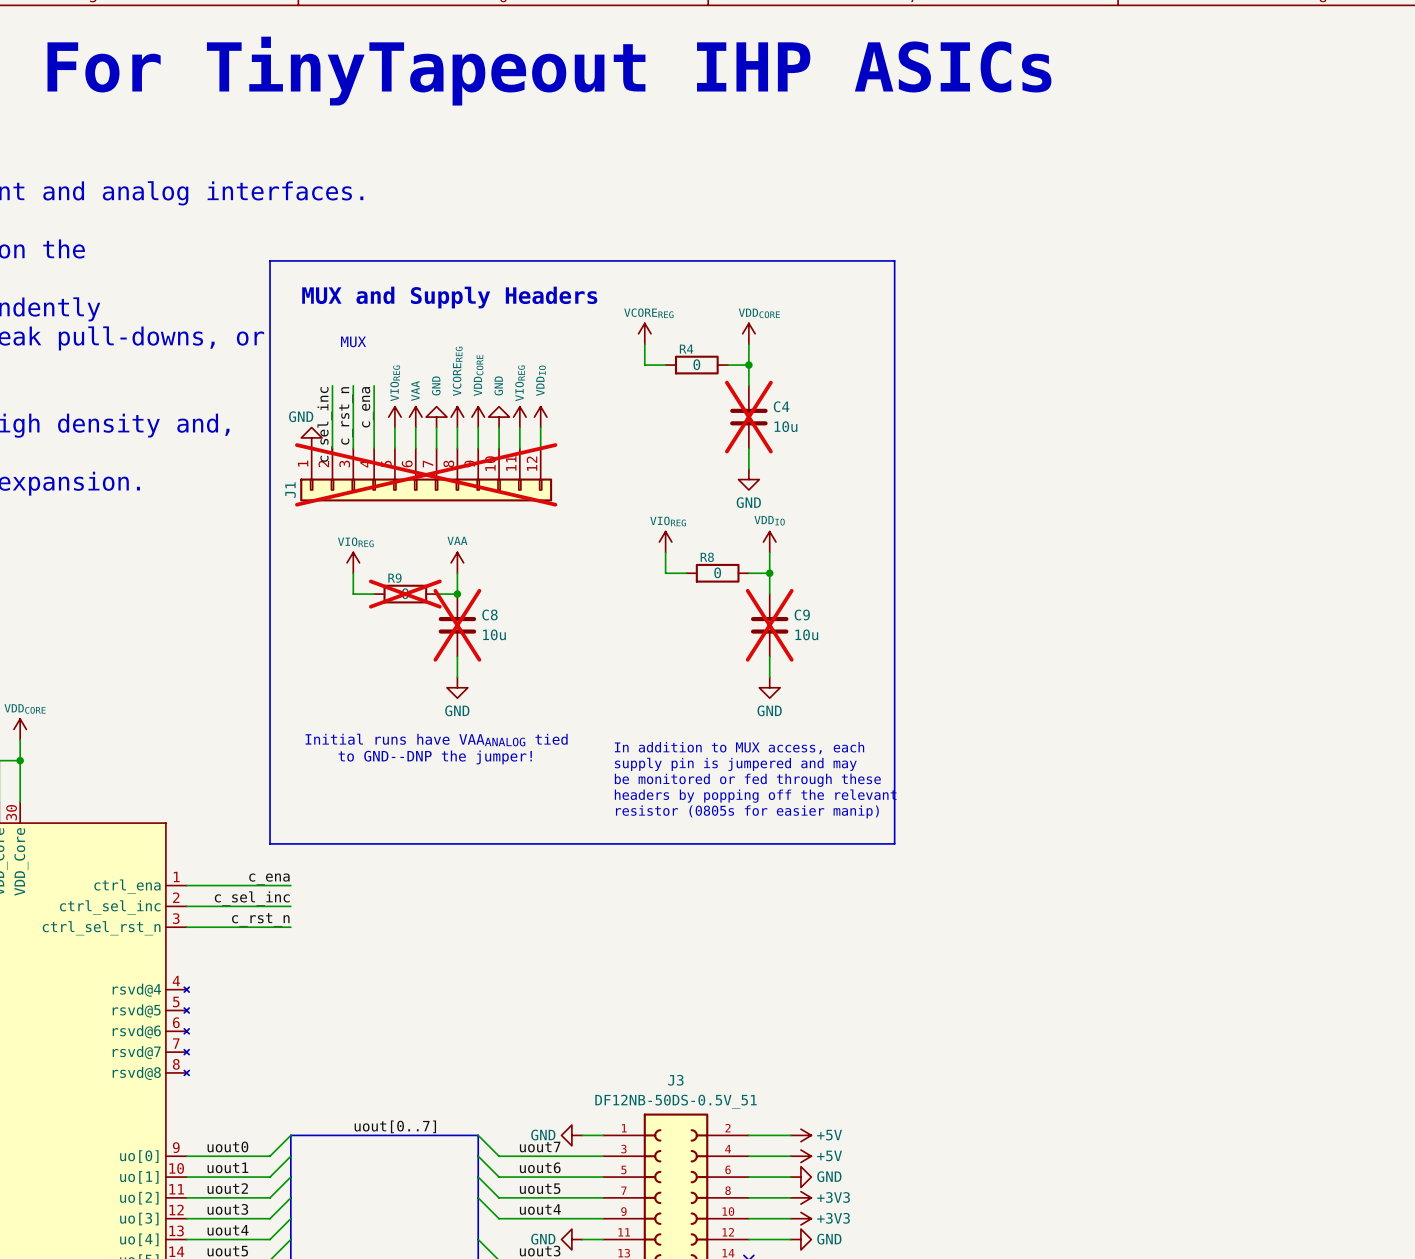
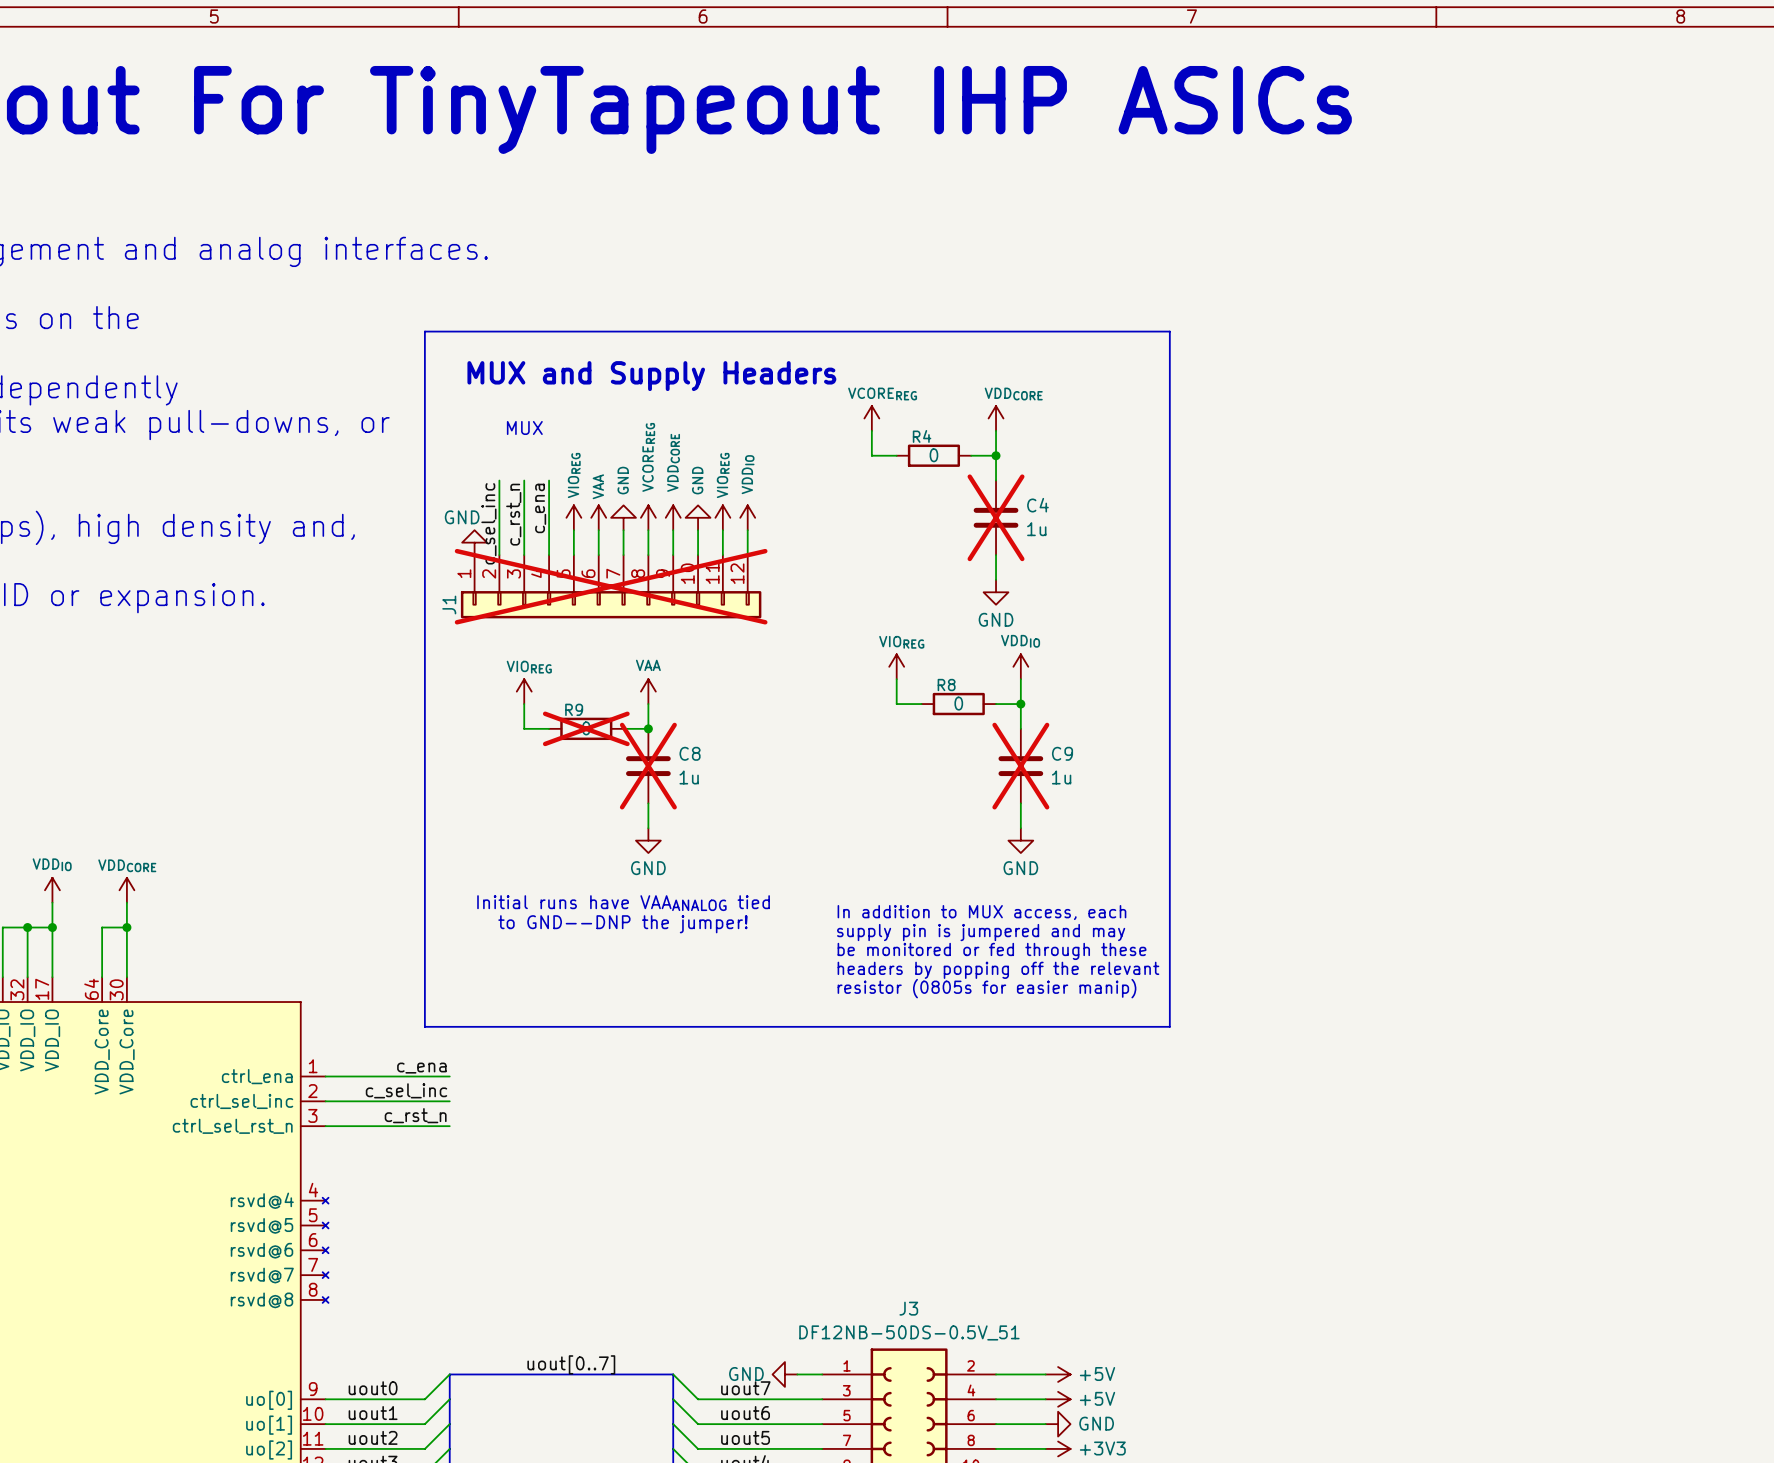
C4 text: 10u (785, 426) -> 1u (1036, 529)
C8 text: 10u (494, 634) -> 1u (689, 777)
C9 text: 10u (806, 634) -> 1u (1061, 777)

